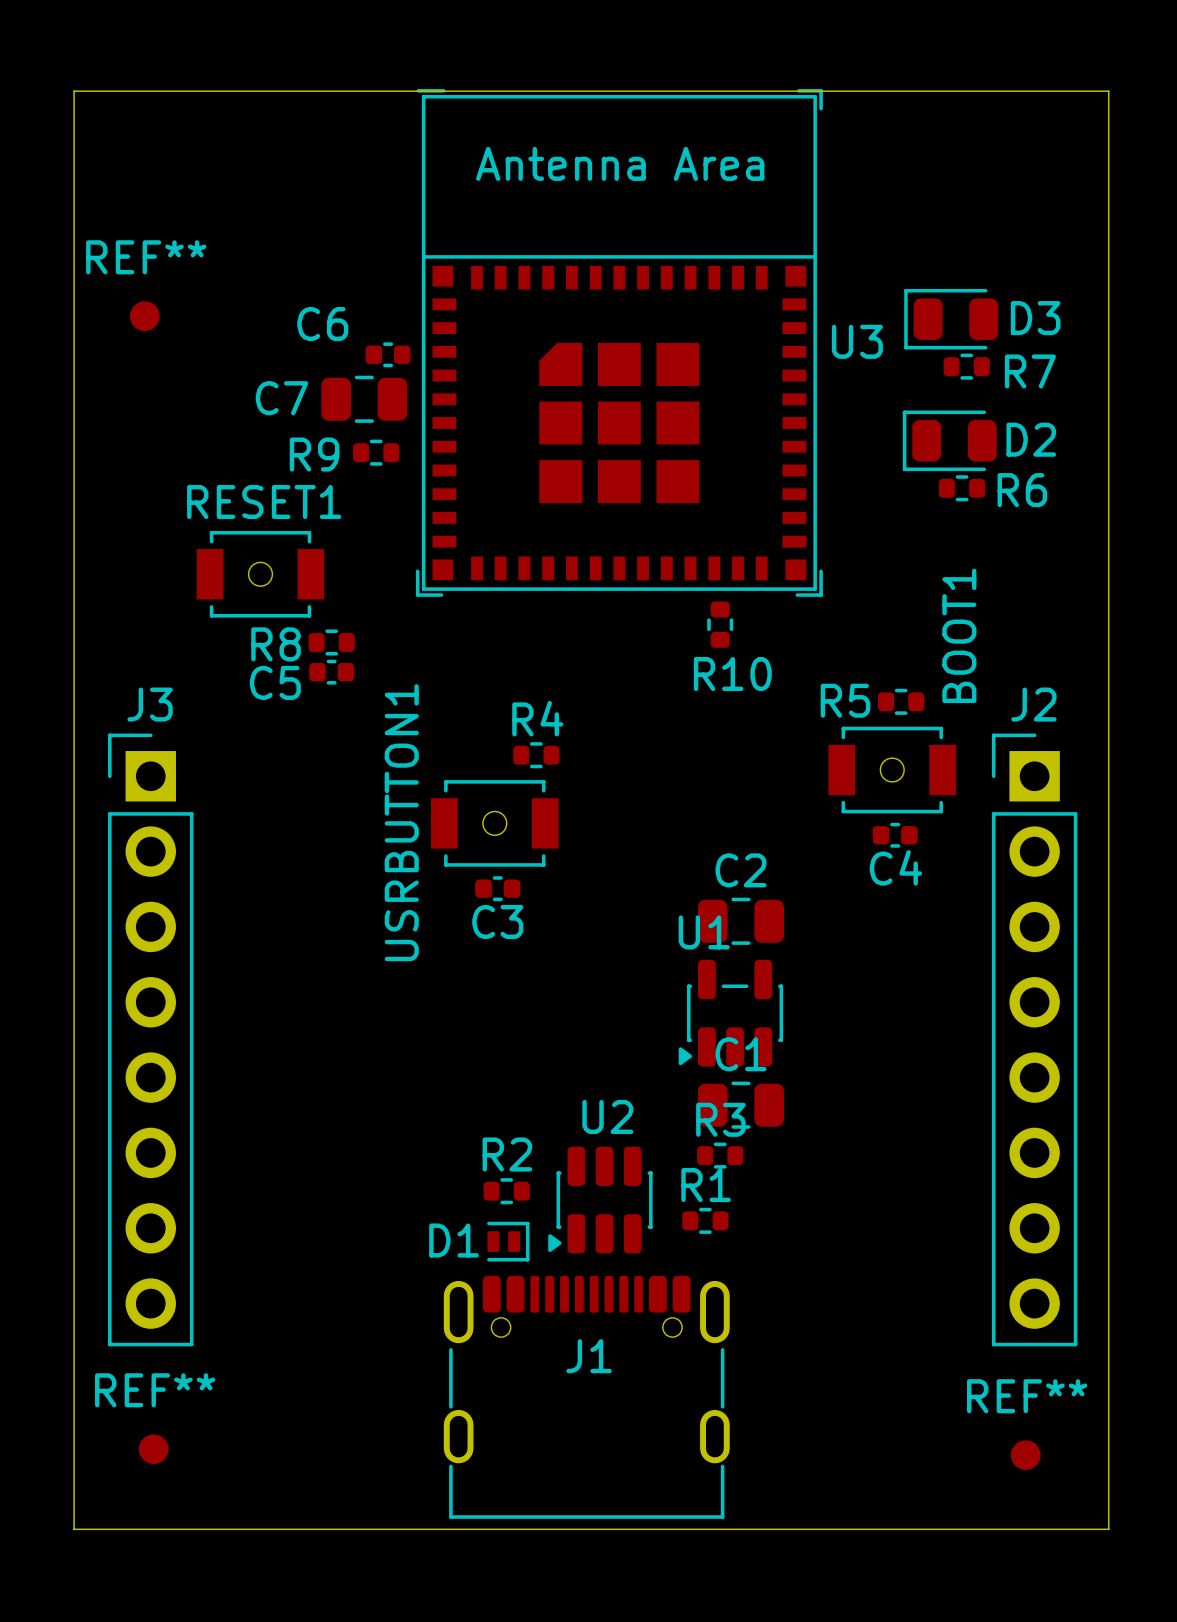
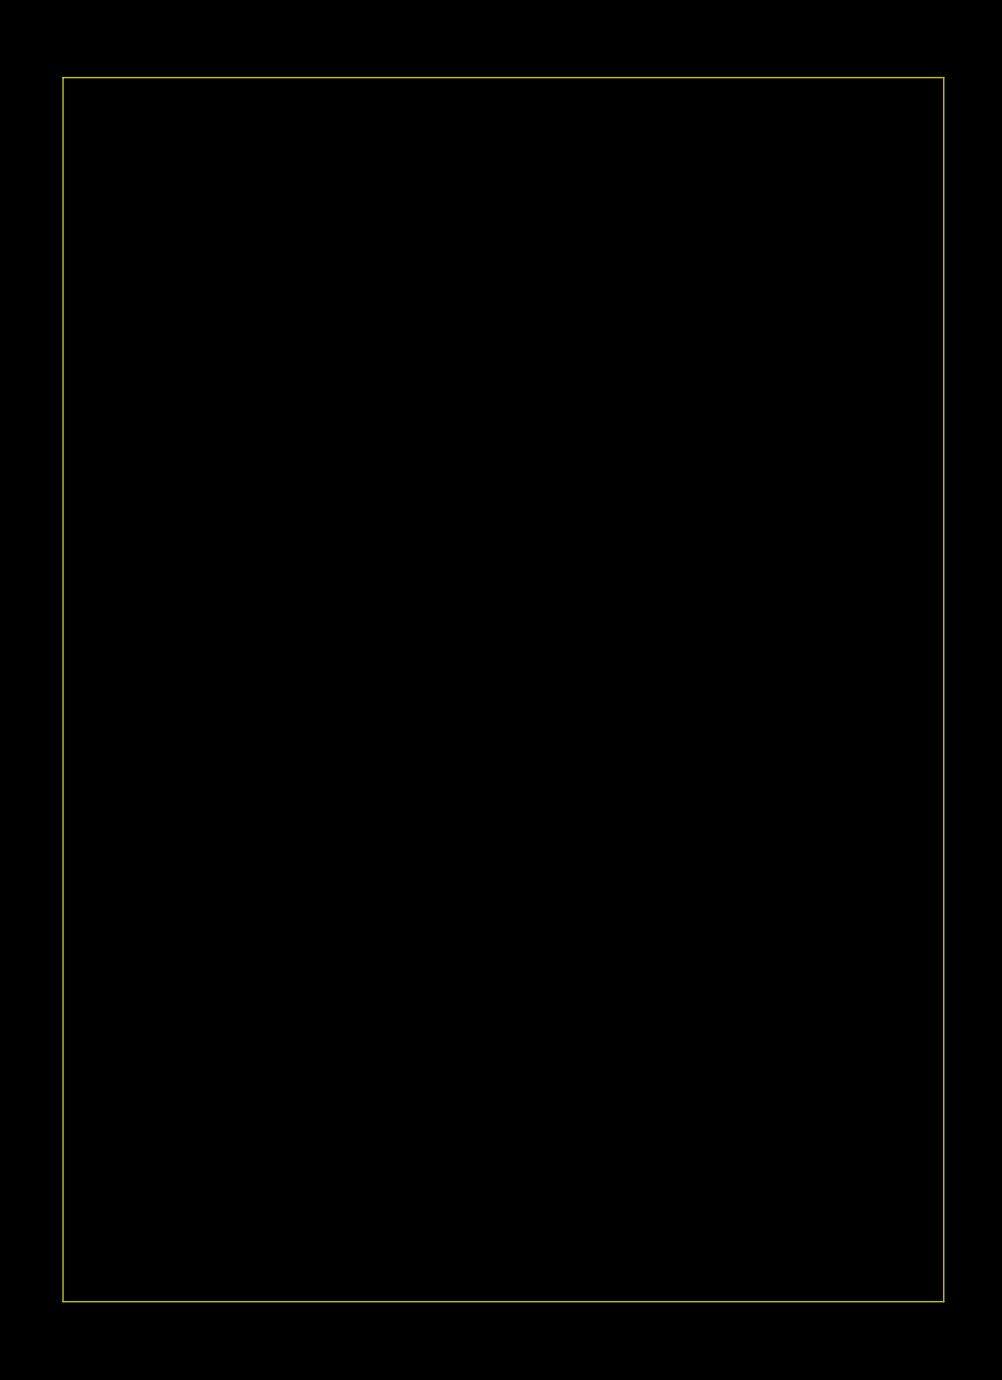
REF**: (144, 316) -> none
D3: (951, 319) -> none
U3: (619, 342) -> none
C6: (388, 354) -> none
R7: (966, 366) -> none
C7: (364, 399) -> none
D2: (949, 440) -> none
R9: (376, 452) -> none
R6: (962, 488) -> none
RESET1: (260, 574) -> none
R10: (720, 624) -> none
R8: (331, 642) -> none
C5: (331, 672) -> none
R5: (901, 701) -> none
R4: (536, 755) -> none
BOOT1: (892, 770) -> none
USRBUTTON1: (494, 823) -> none
C4: (895, 835) -> none
C3: (497, 888) -> none
C2: (741, 921) -> none
U1: (730, 1013) -> none
J3: (150, 1039) -> none
J2: (1034, 1039) -> none
C1: (741, 1105) -> none
R3: (720, 1155) -> none
R2: (506, 1191) -> none
U2: (600, 1200) -> none
R1: (705, 1220) -> none
D1: (508, 1241) -> none
J1: (586, 1397) -> none
REF**: (153, 1449) -> none
REF**: (1025, 1455) -> none

